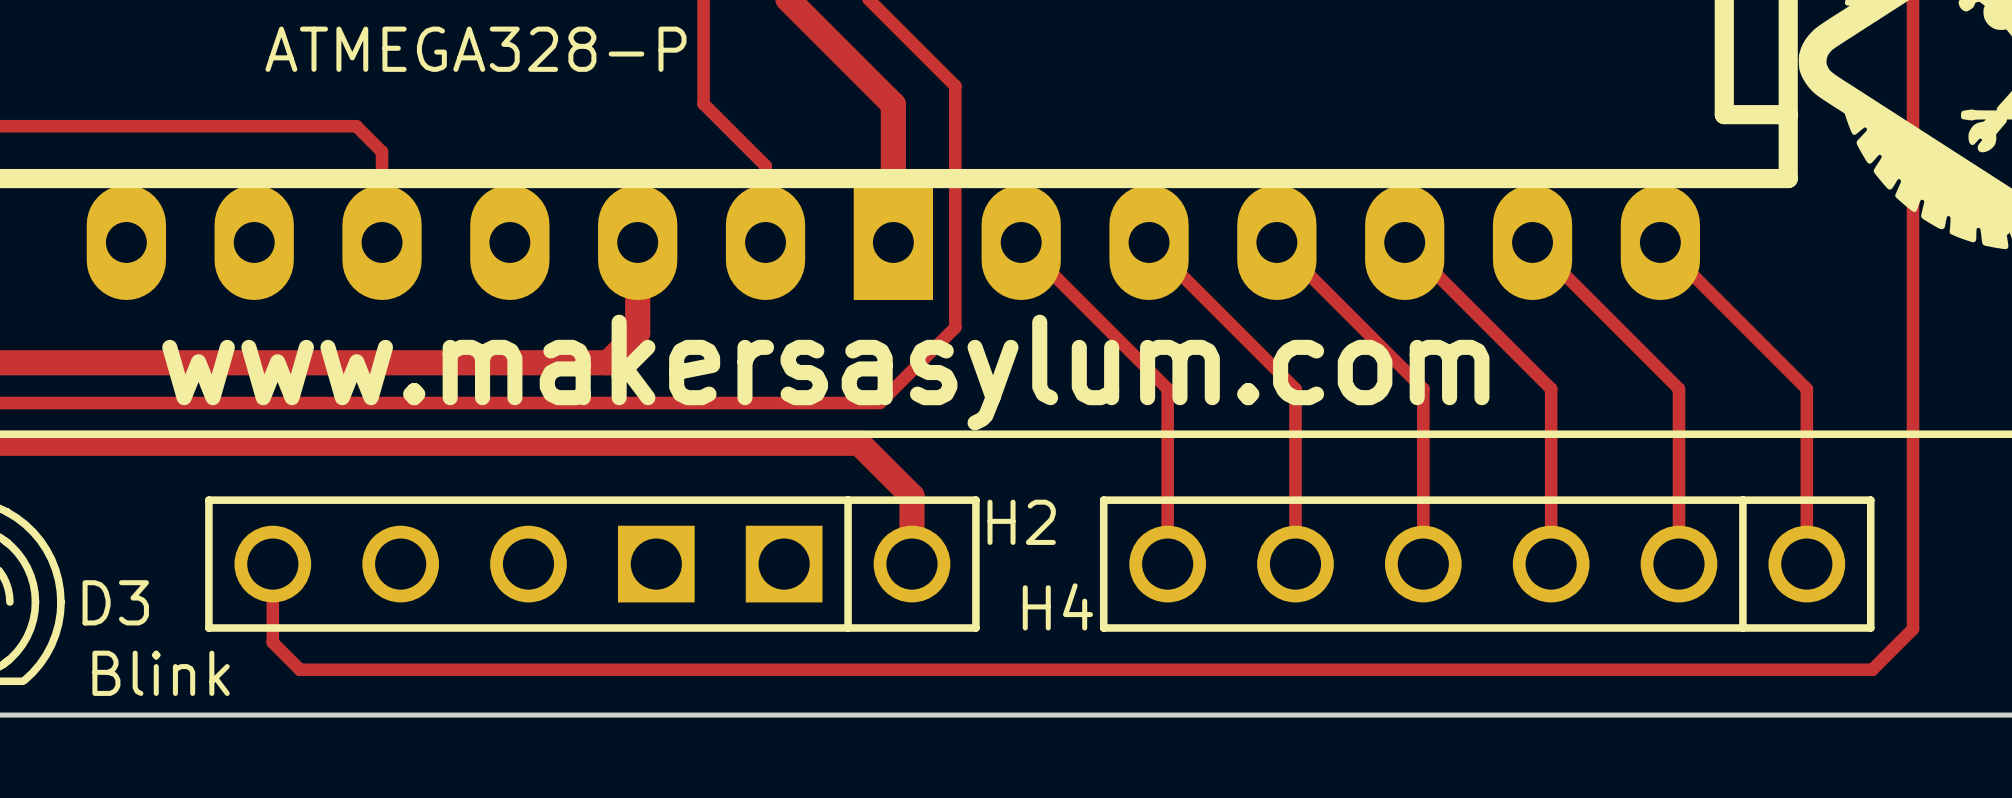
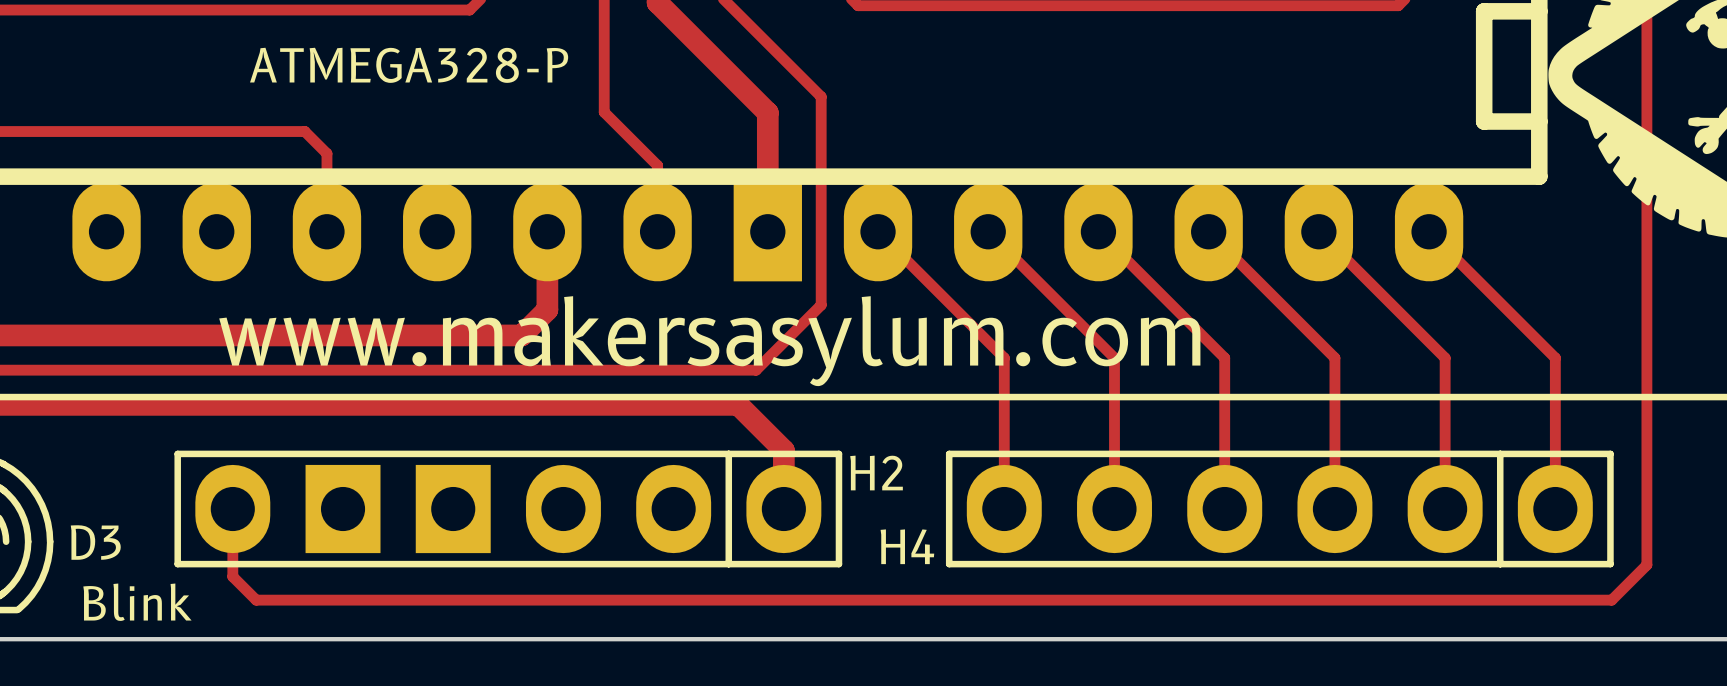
H2 footprint: [205, 496, 980, 632] -> [174, 450, 843, 568]
H4 footprint: [1099, 496, 1875, 632] -> [945, 450, 1614, 568]

